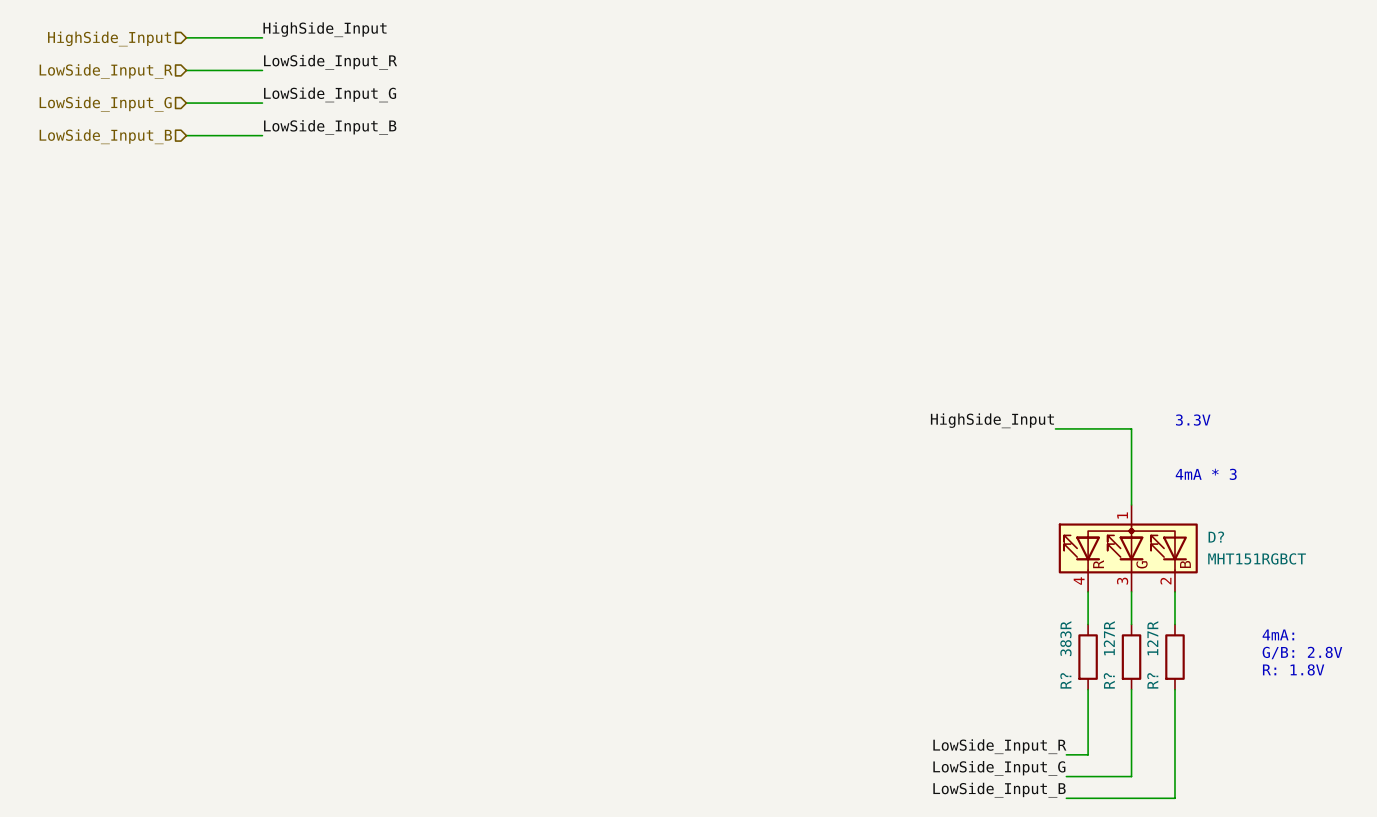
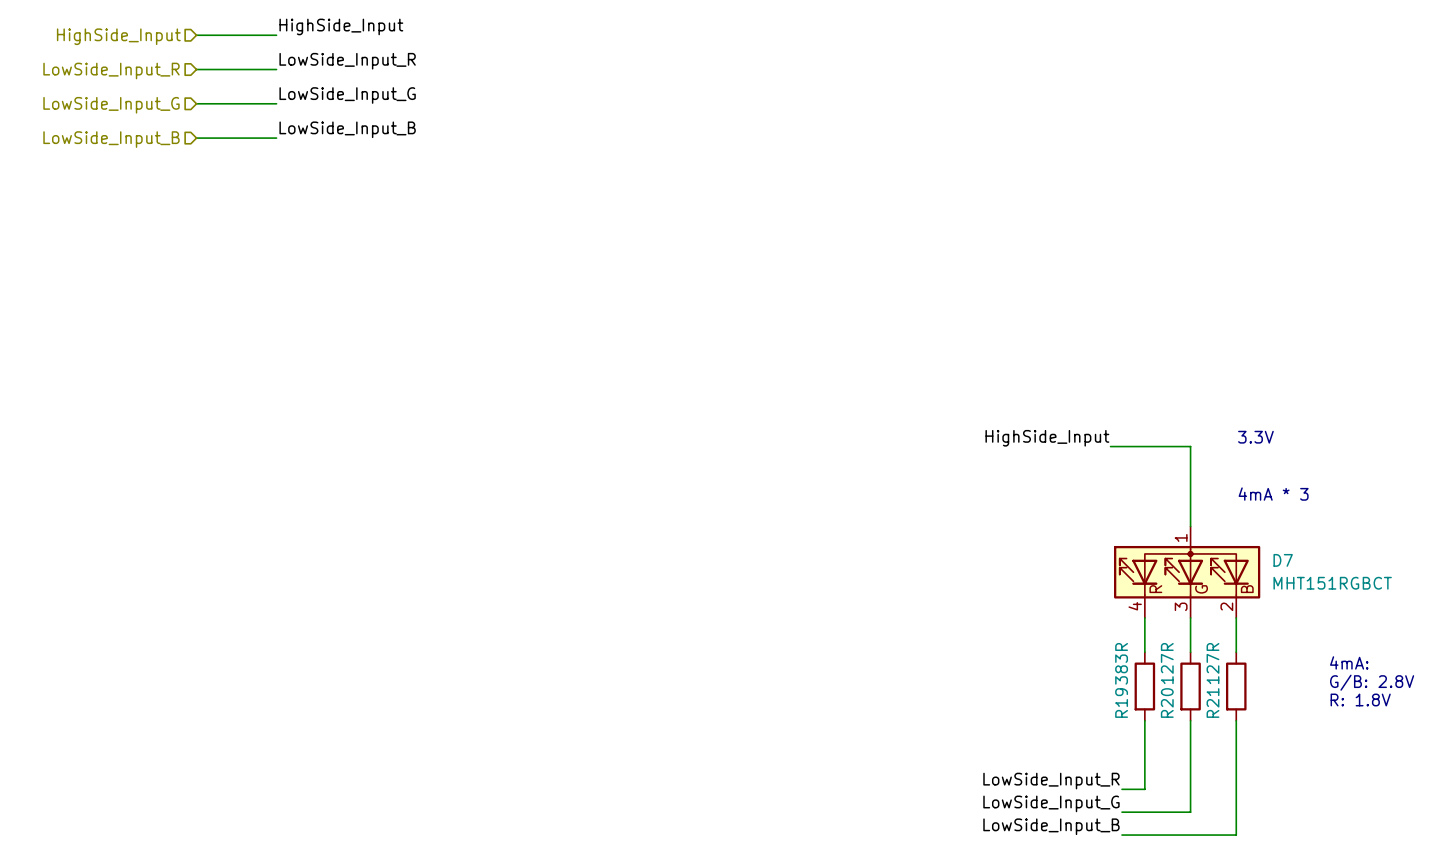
D? name: D? (1216, 537) -> D7 (1283, 560)
R? name: R? (1065, 680) -> R19 (1121, 703)
R? name: R? (1109, 680) -> R20 (1167, 703)
R? name: R? (1152, 680) -> R21 (1212, 703)

